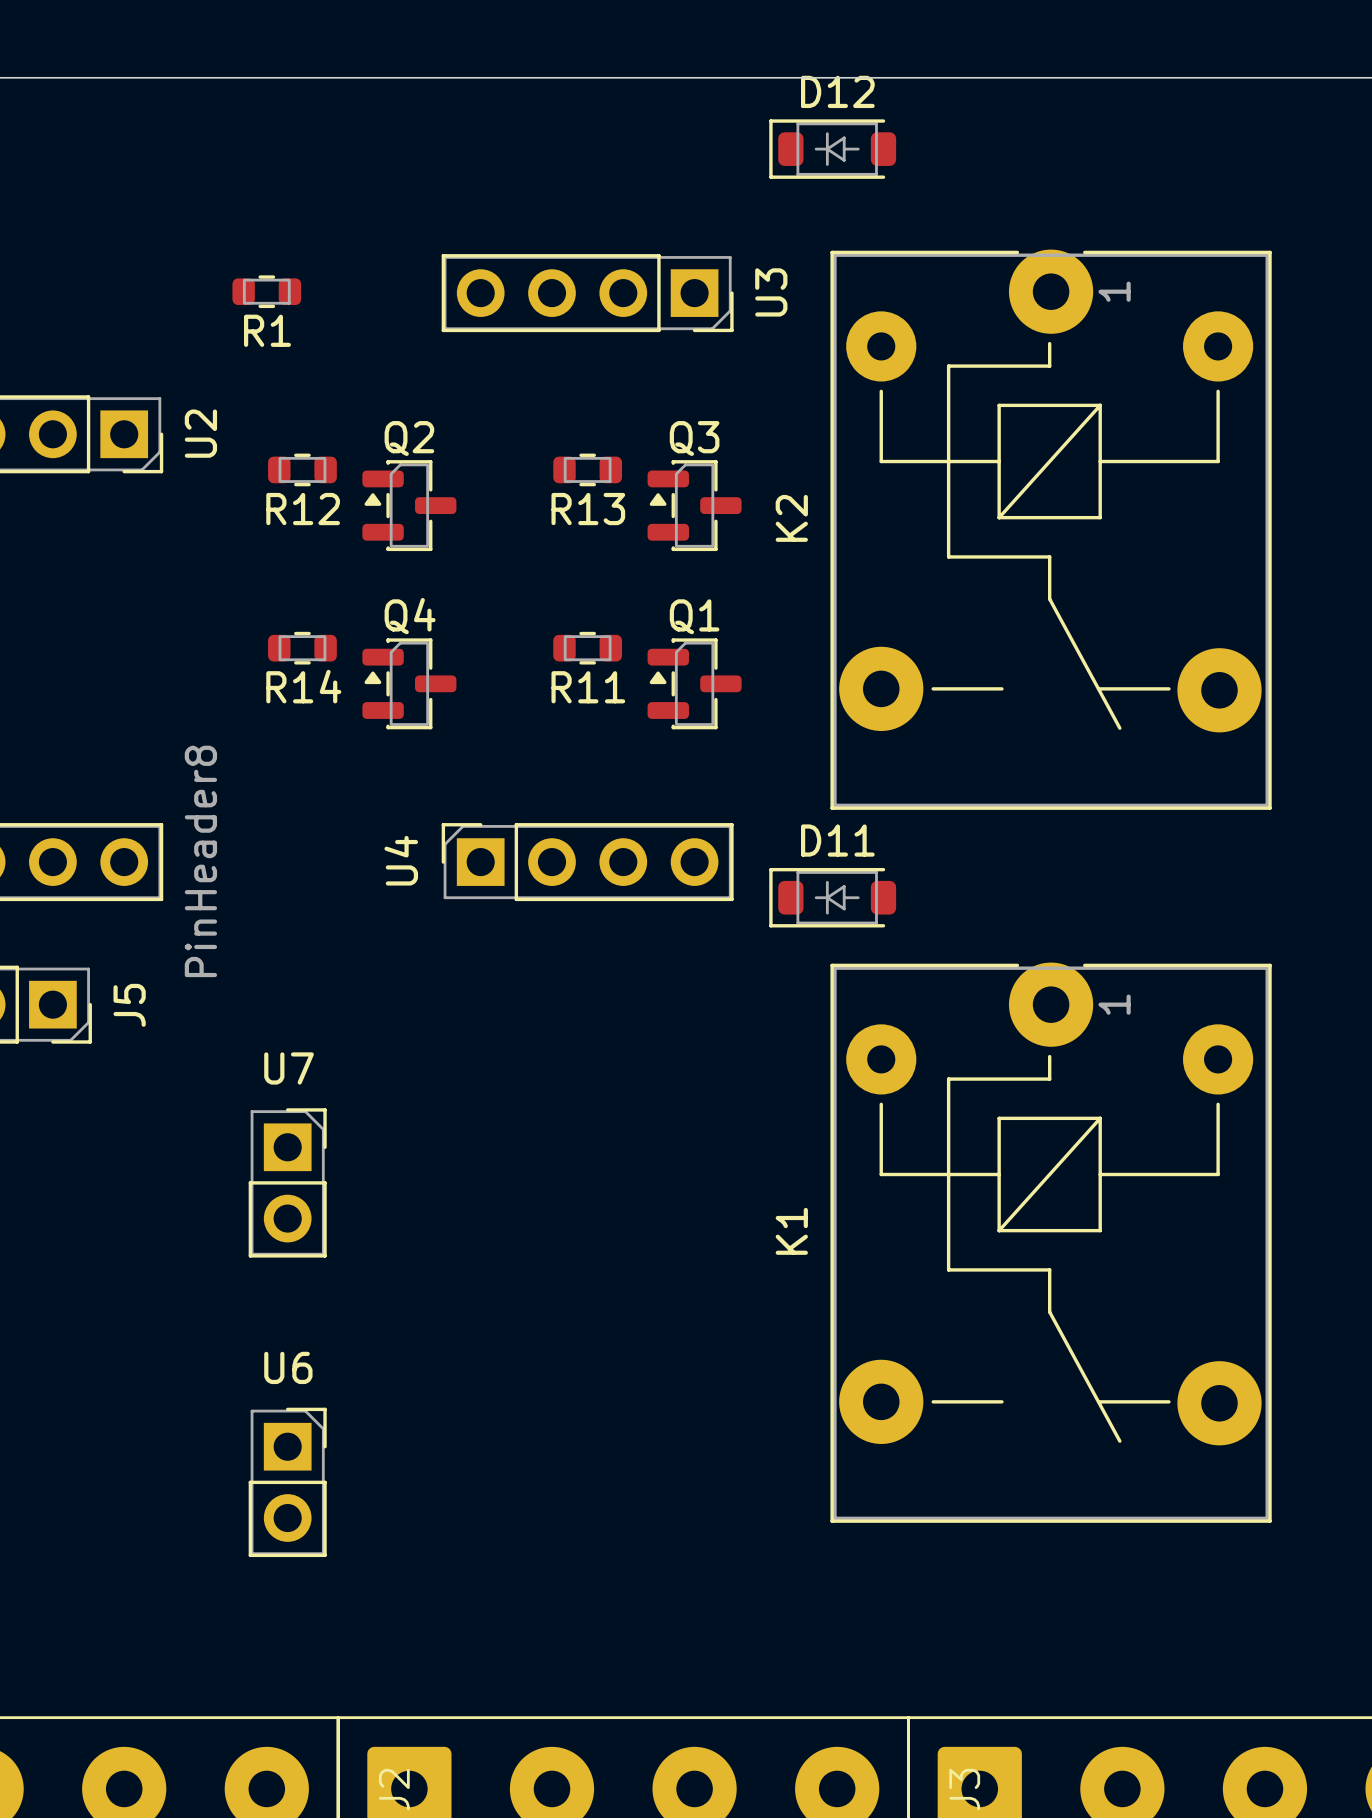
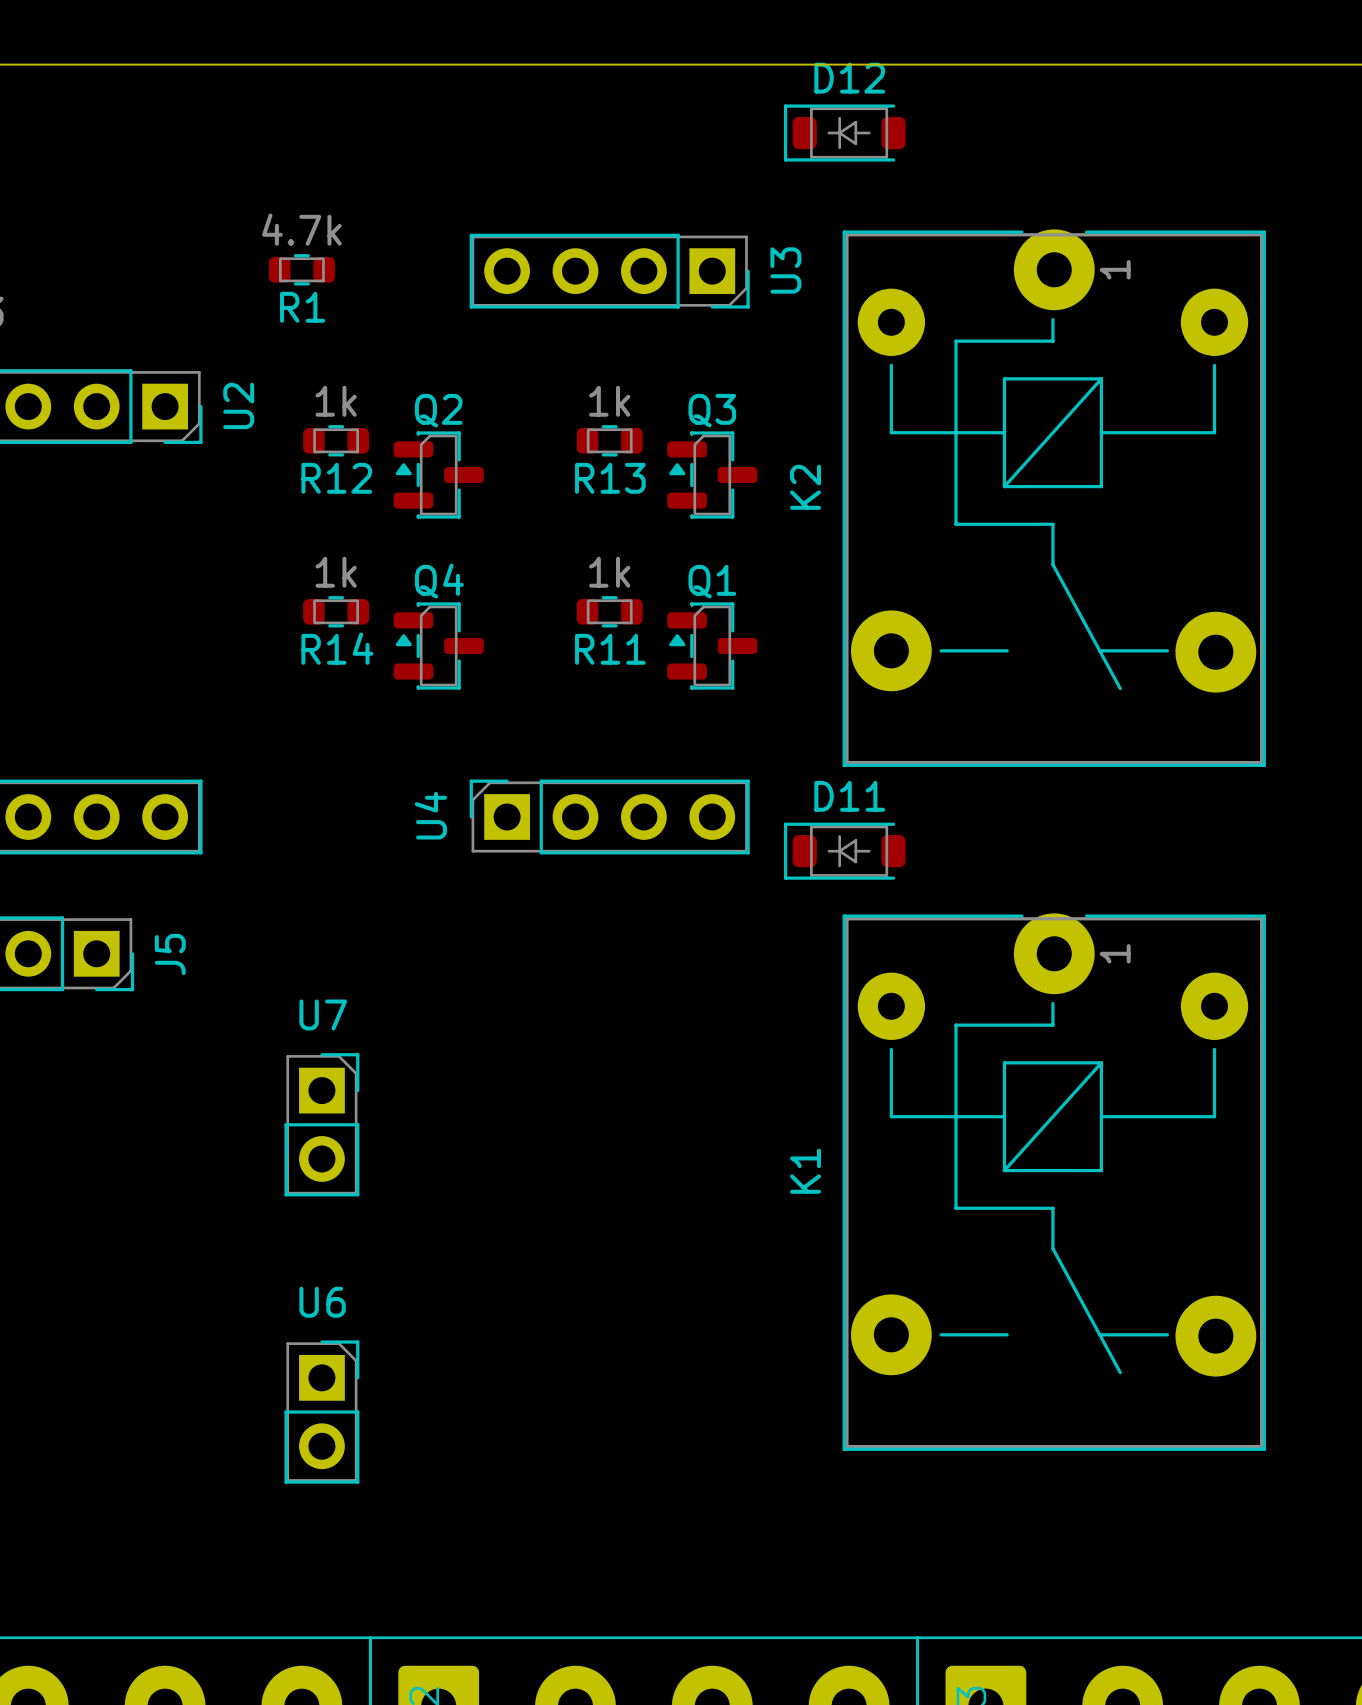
R1 value: none -> 4.7k (301, 229)
R12 value: none -> 1k (336, 401)
R13 value: none -> 1k (609, 401)
R14 value: none -> 1k (336, 572)
R11 value: none -> 1k (609, 572)
part value: PinHeader8 (200, 861) -> none

